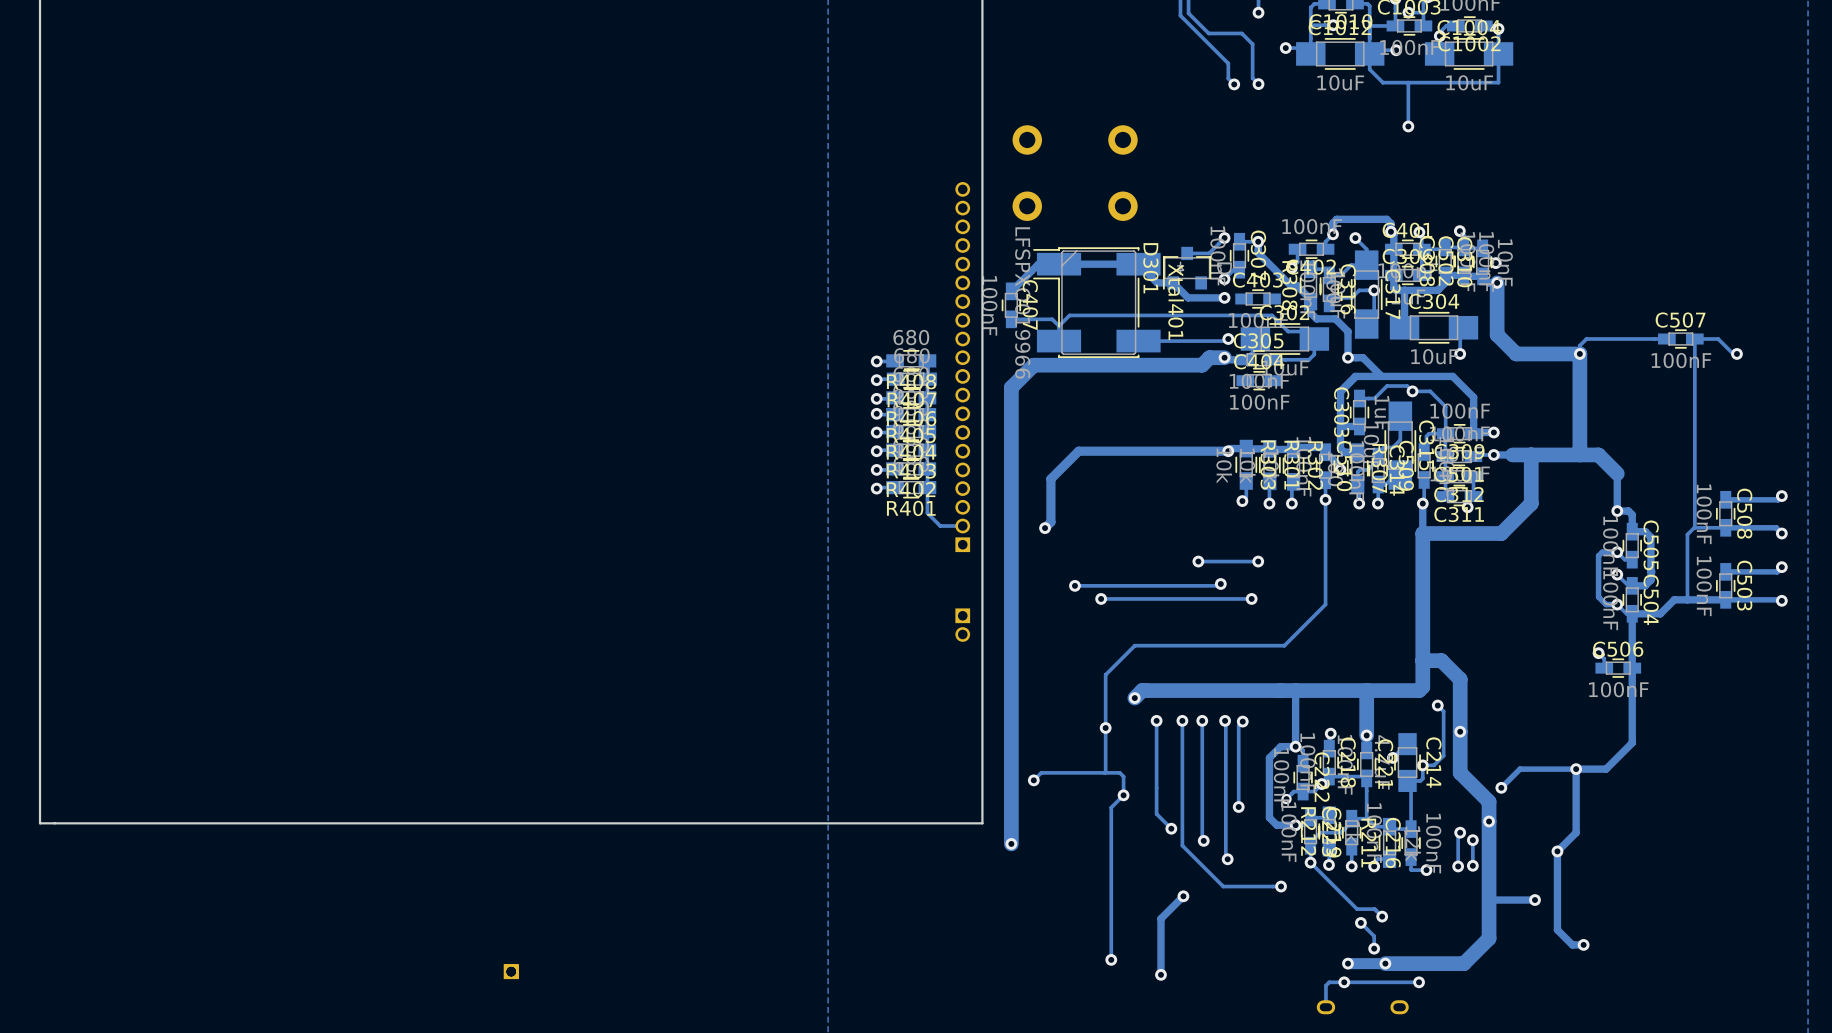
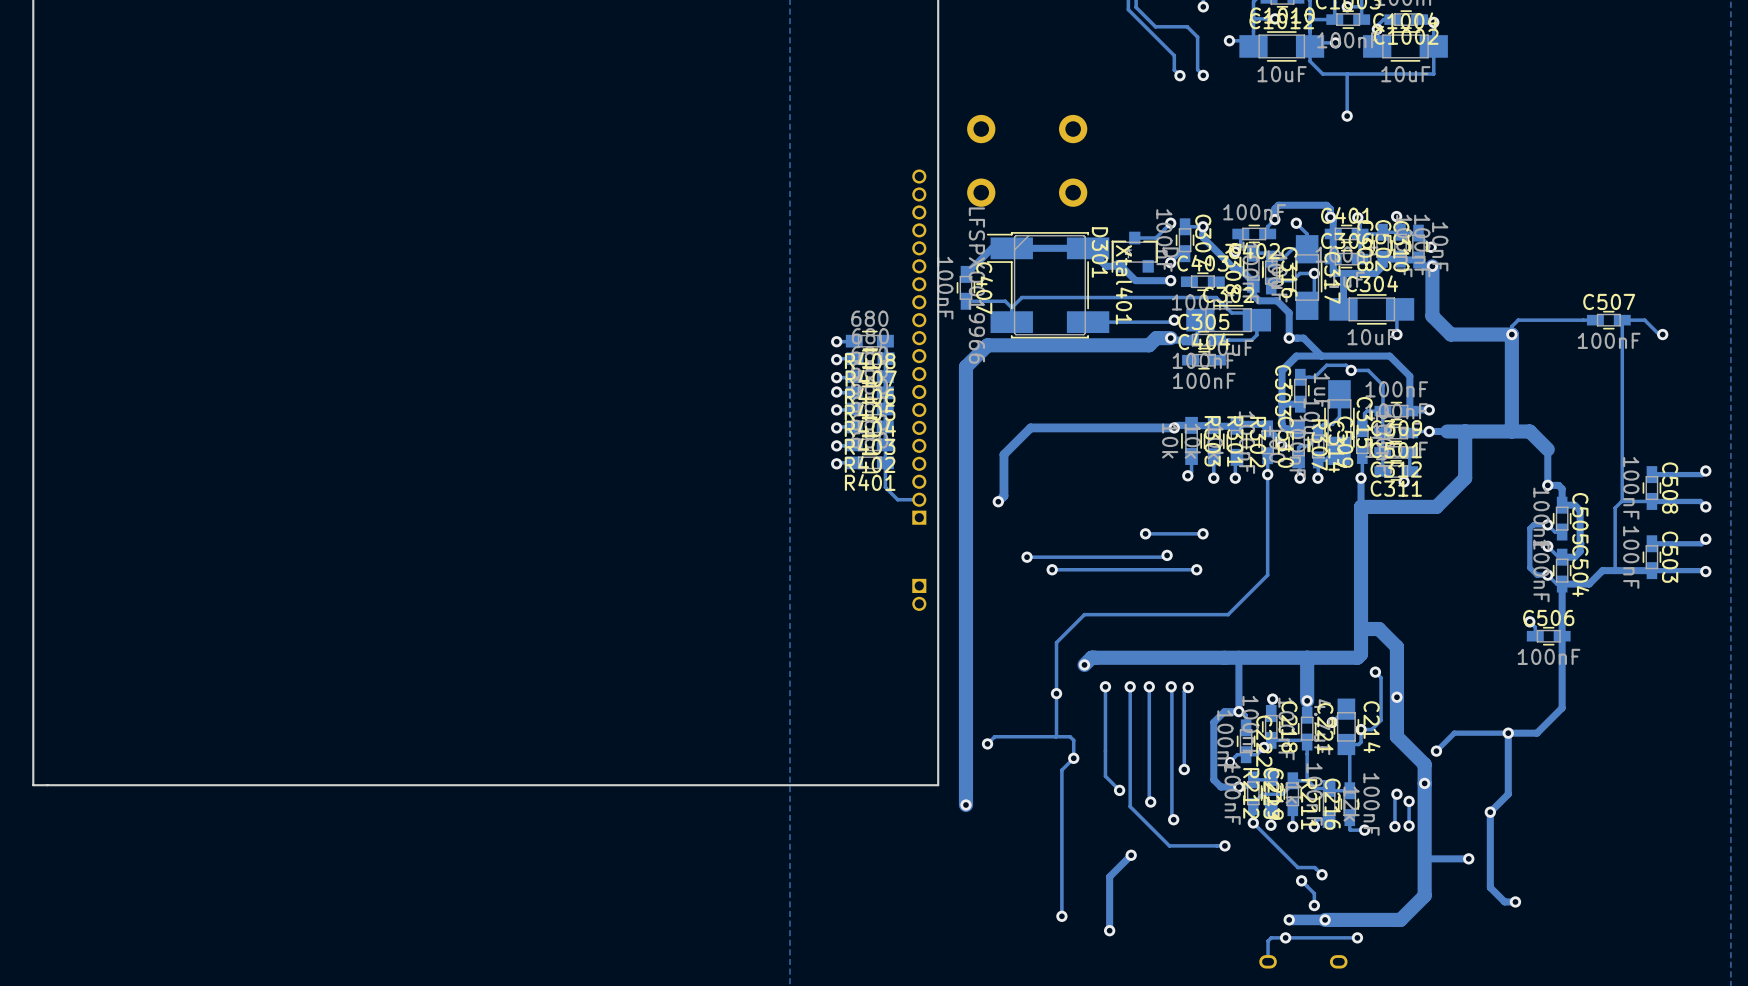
part: (511, 971) -> none

